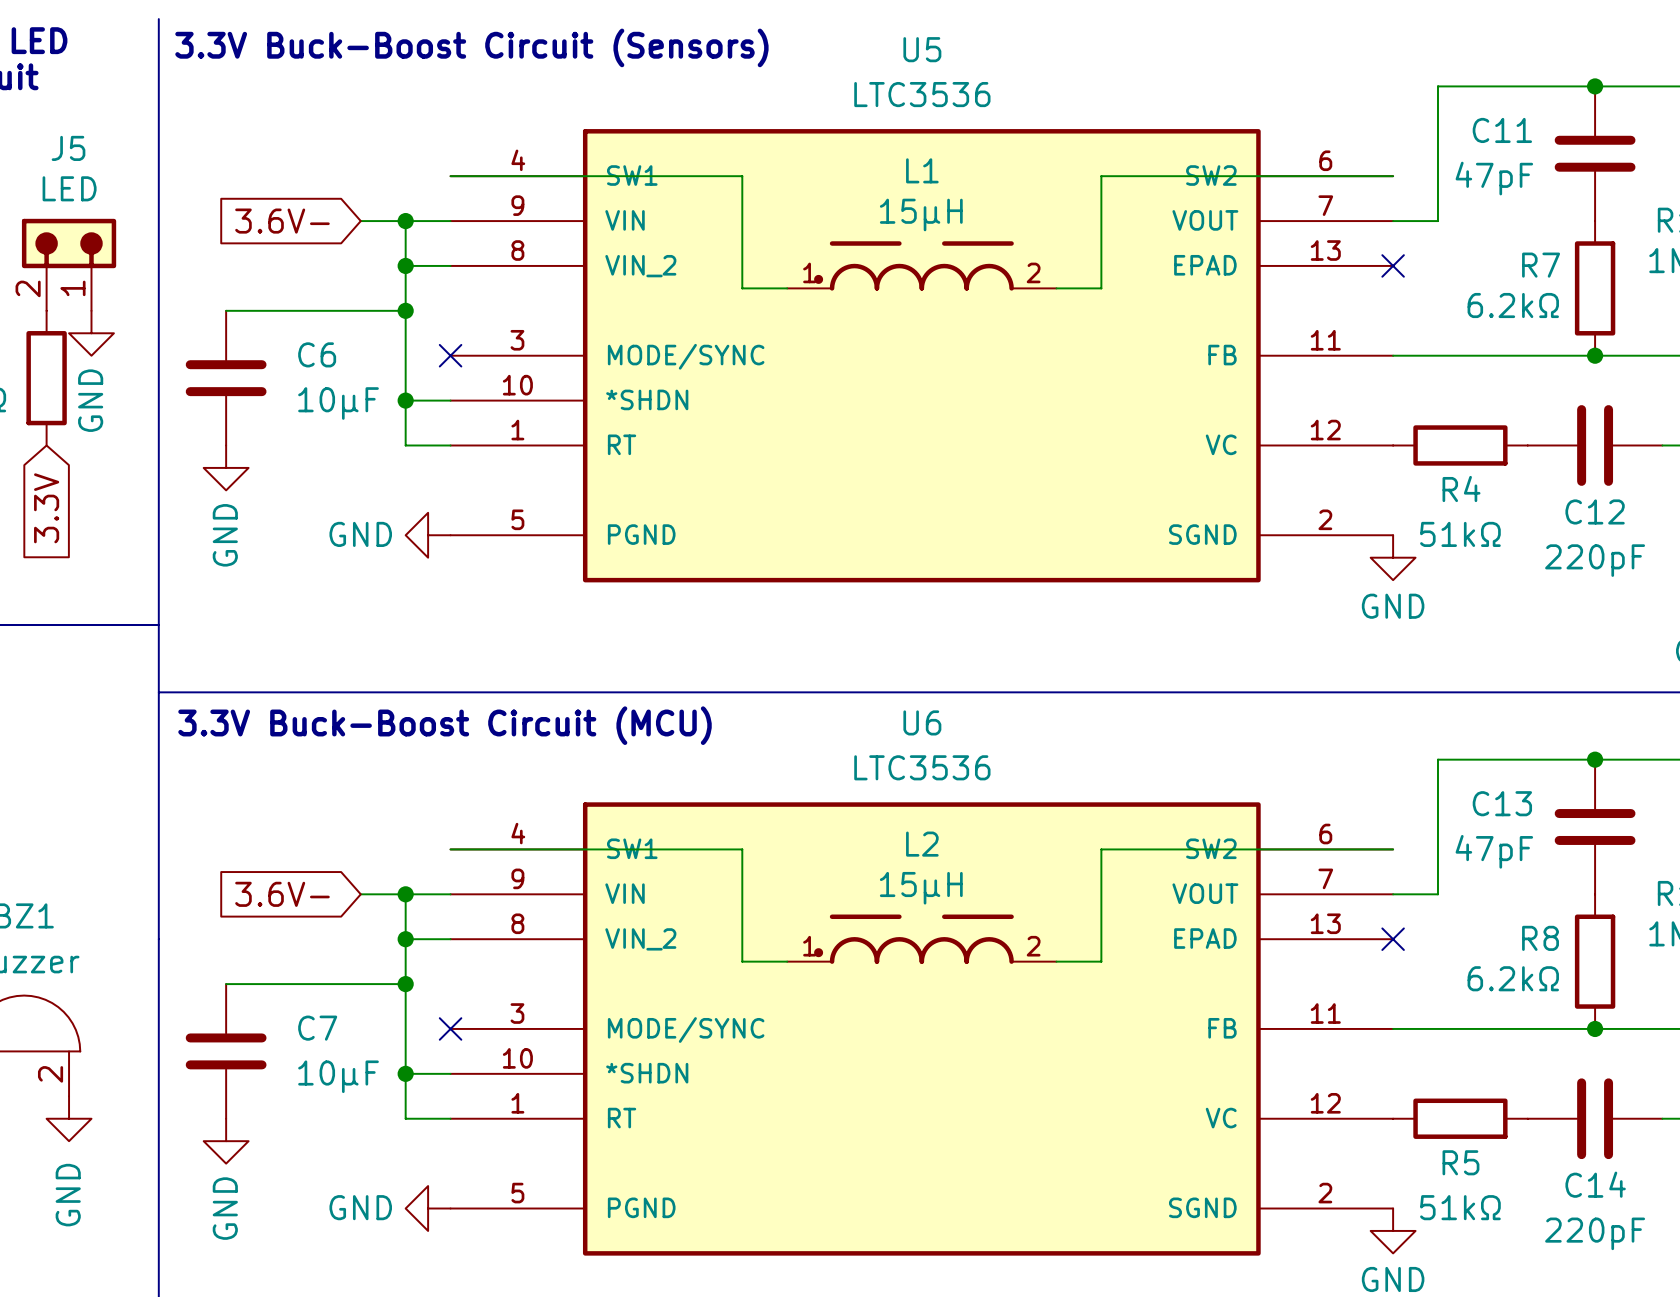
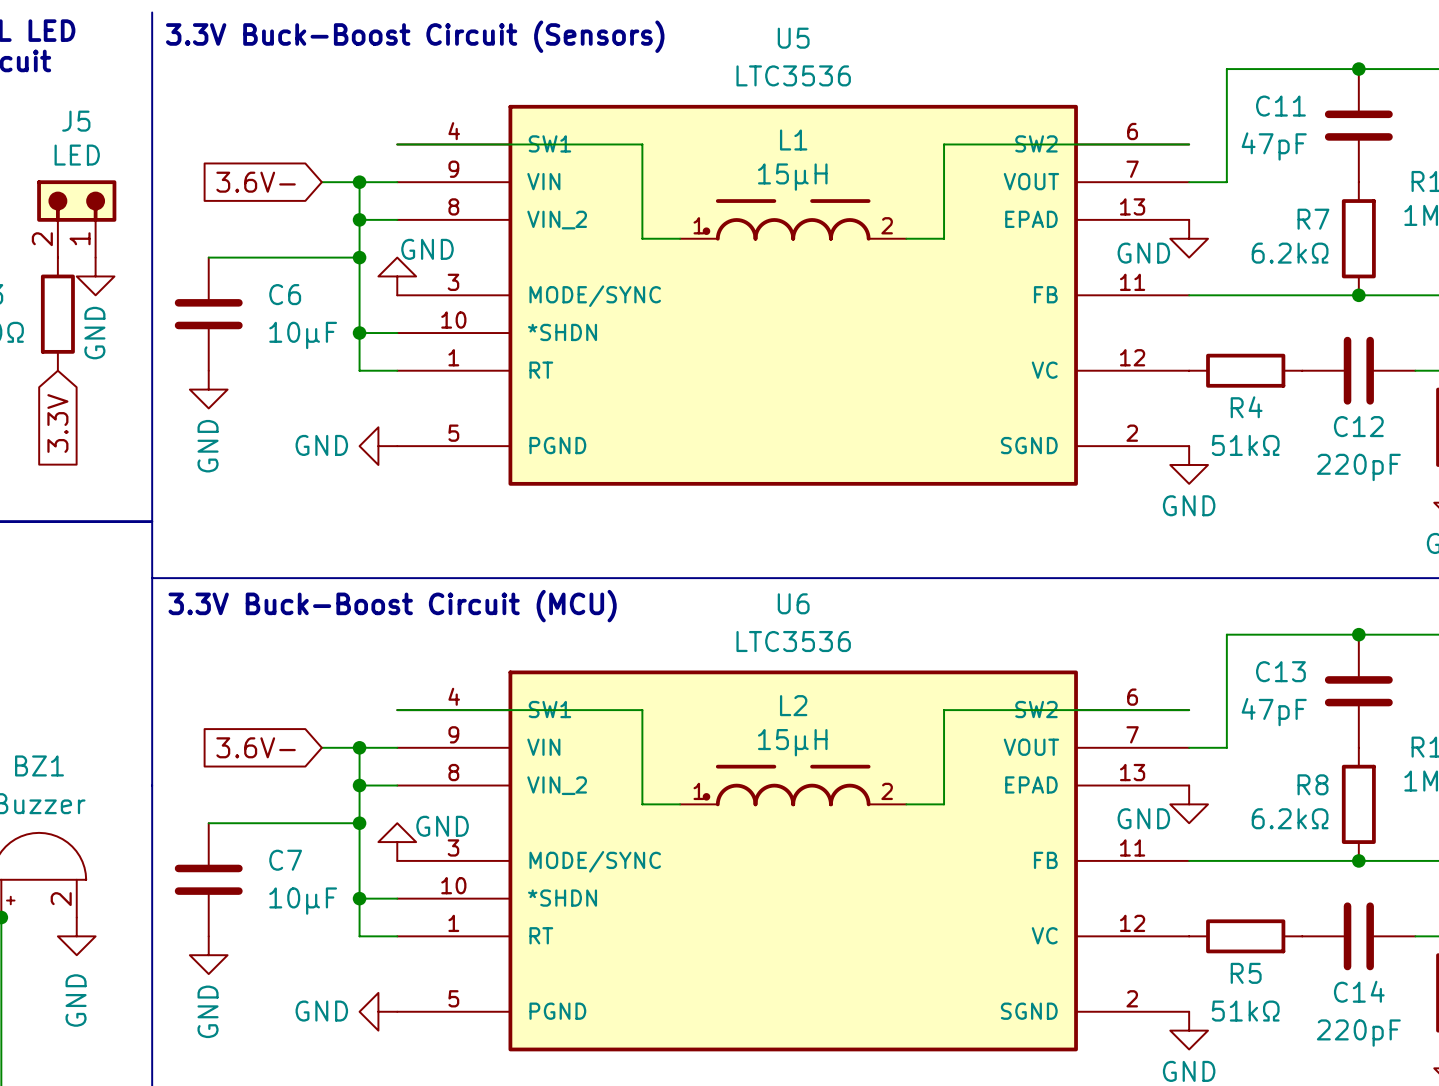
no-connect mark: (1393, 265) -> none
power symbol: none -> GND (1189, 238)
power symbol: none -> GND (397, 276)
no-connect mark: (450, 355) -> none
no-connect mark: (1393, 939) -> none
power symbol: none -> GND (1189, 804)
power symbol: none -> GND (397, 842)
no-connect mark: (450, 1028) -> none

